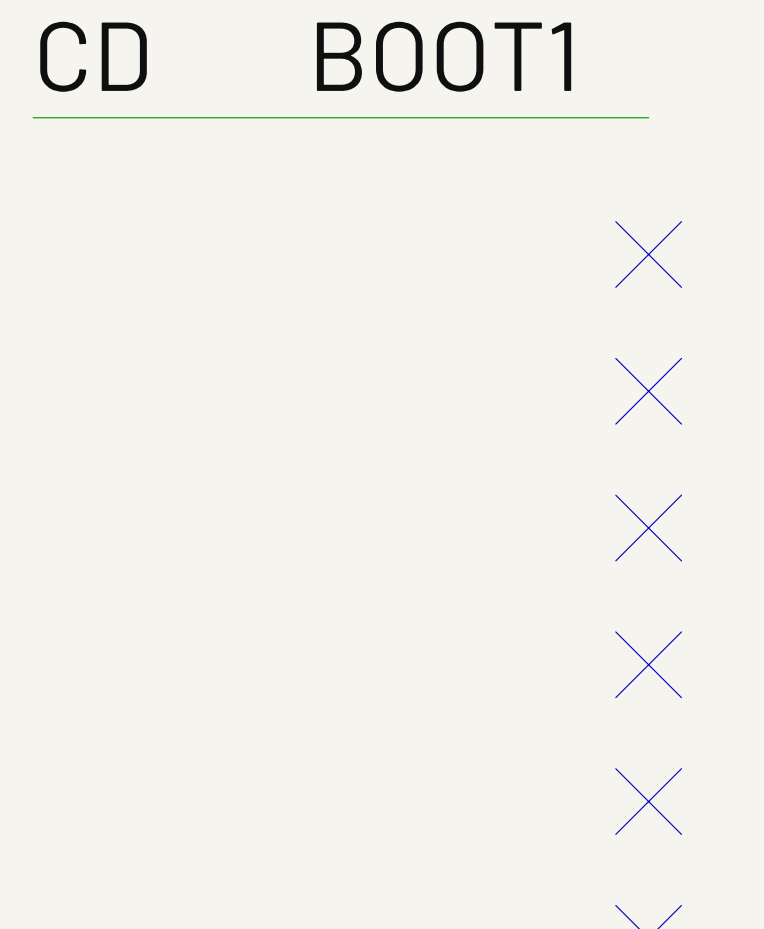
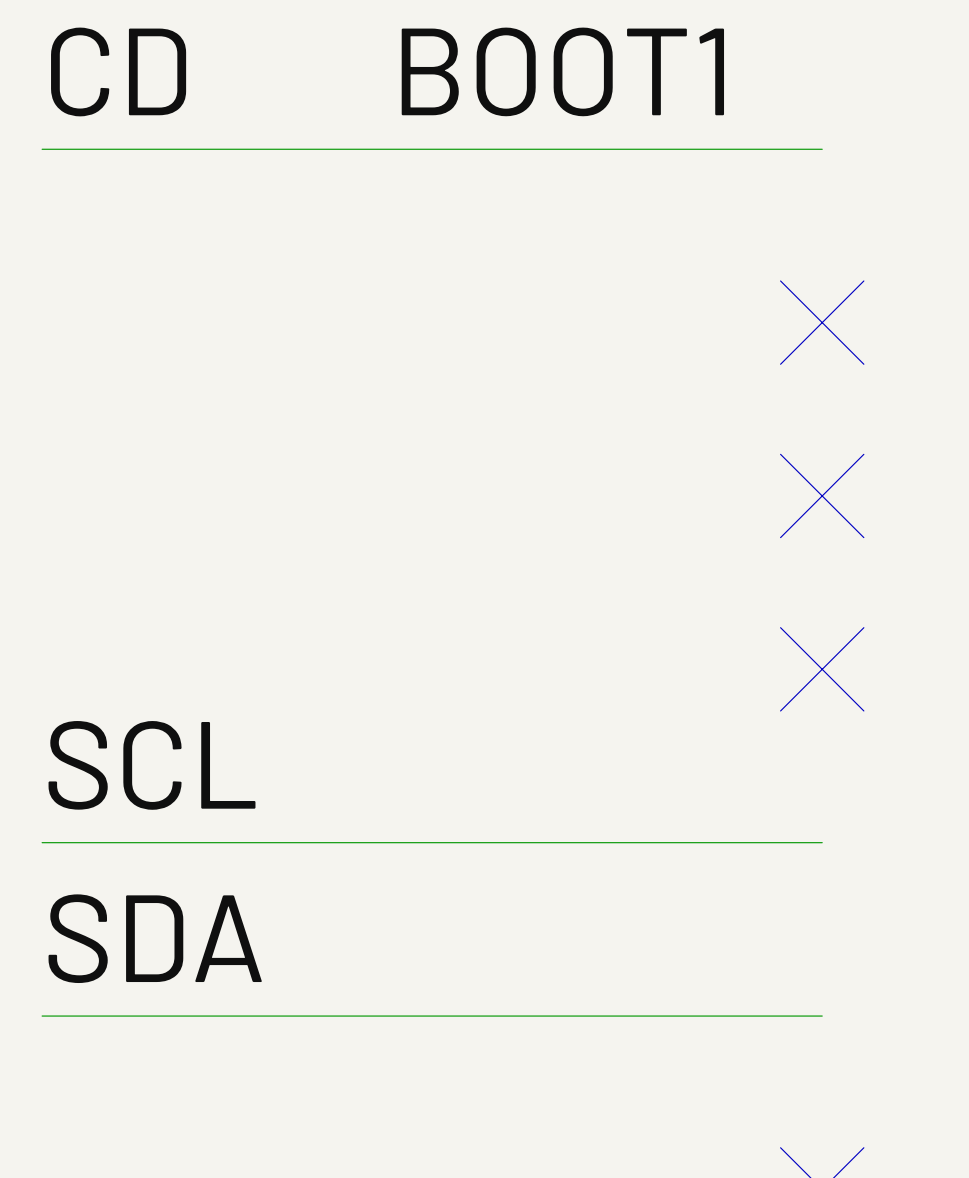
label: none -> SCL (152, 765)
wire: none -> (42, 842) (822, 842)
no-connect mark: (648, 664) -> none
label: none -> SDA (155, 938)
wire: none -> (42, 1016) (822, 1016)
no-connect mark: (648, 801) -> none

